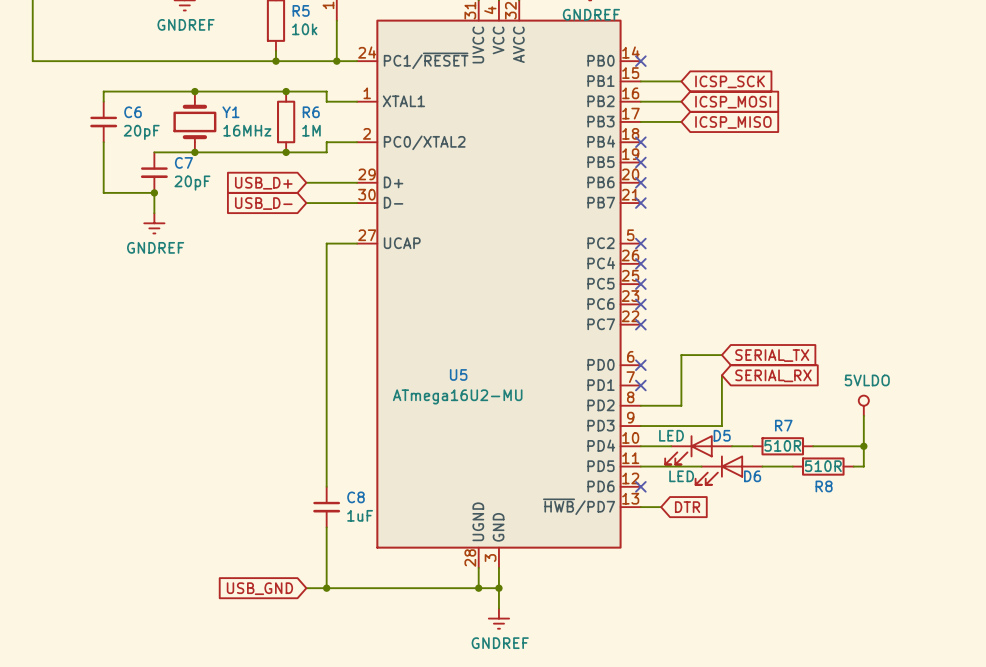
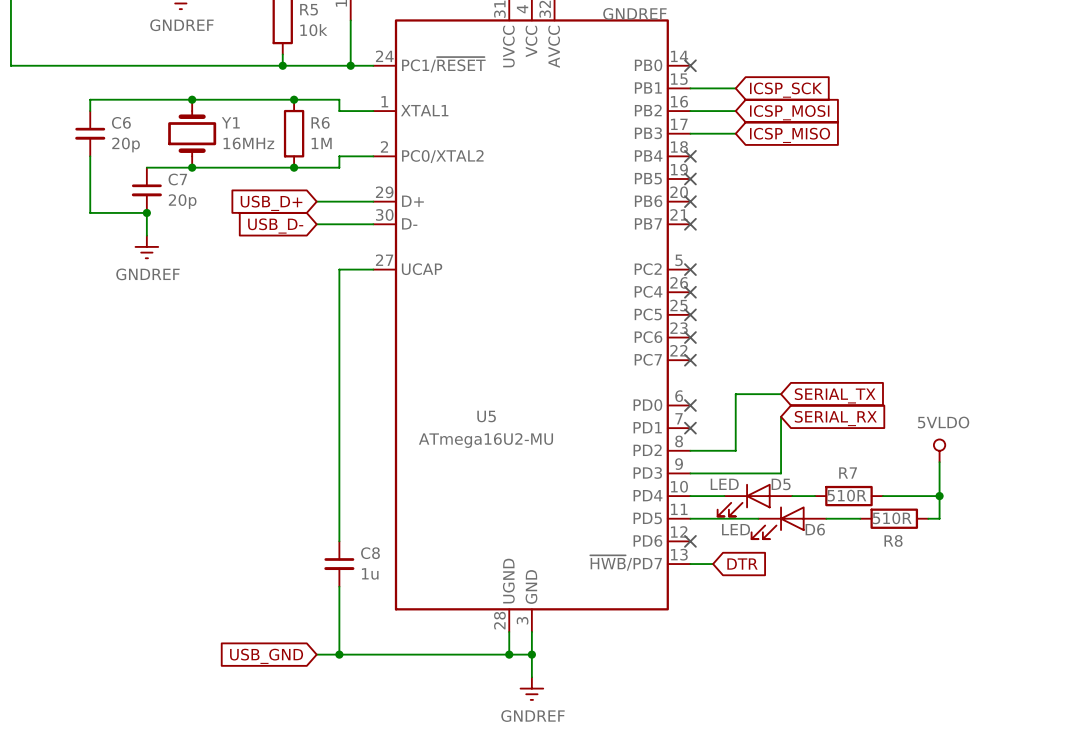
C6 value: 20pF (141, 132) -> 20p (126, 144)
C7 value: 20pF (192, 183) -> 20p (182, 201)
C8 value: 1uF (360, 515) -> 1u (370, 573)

